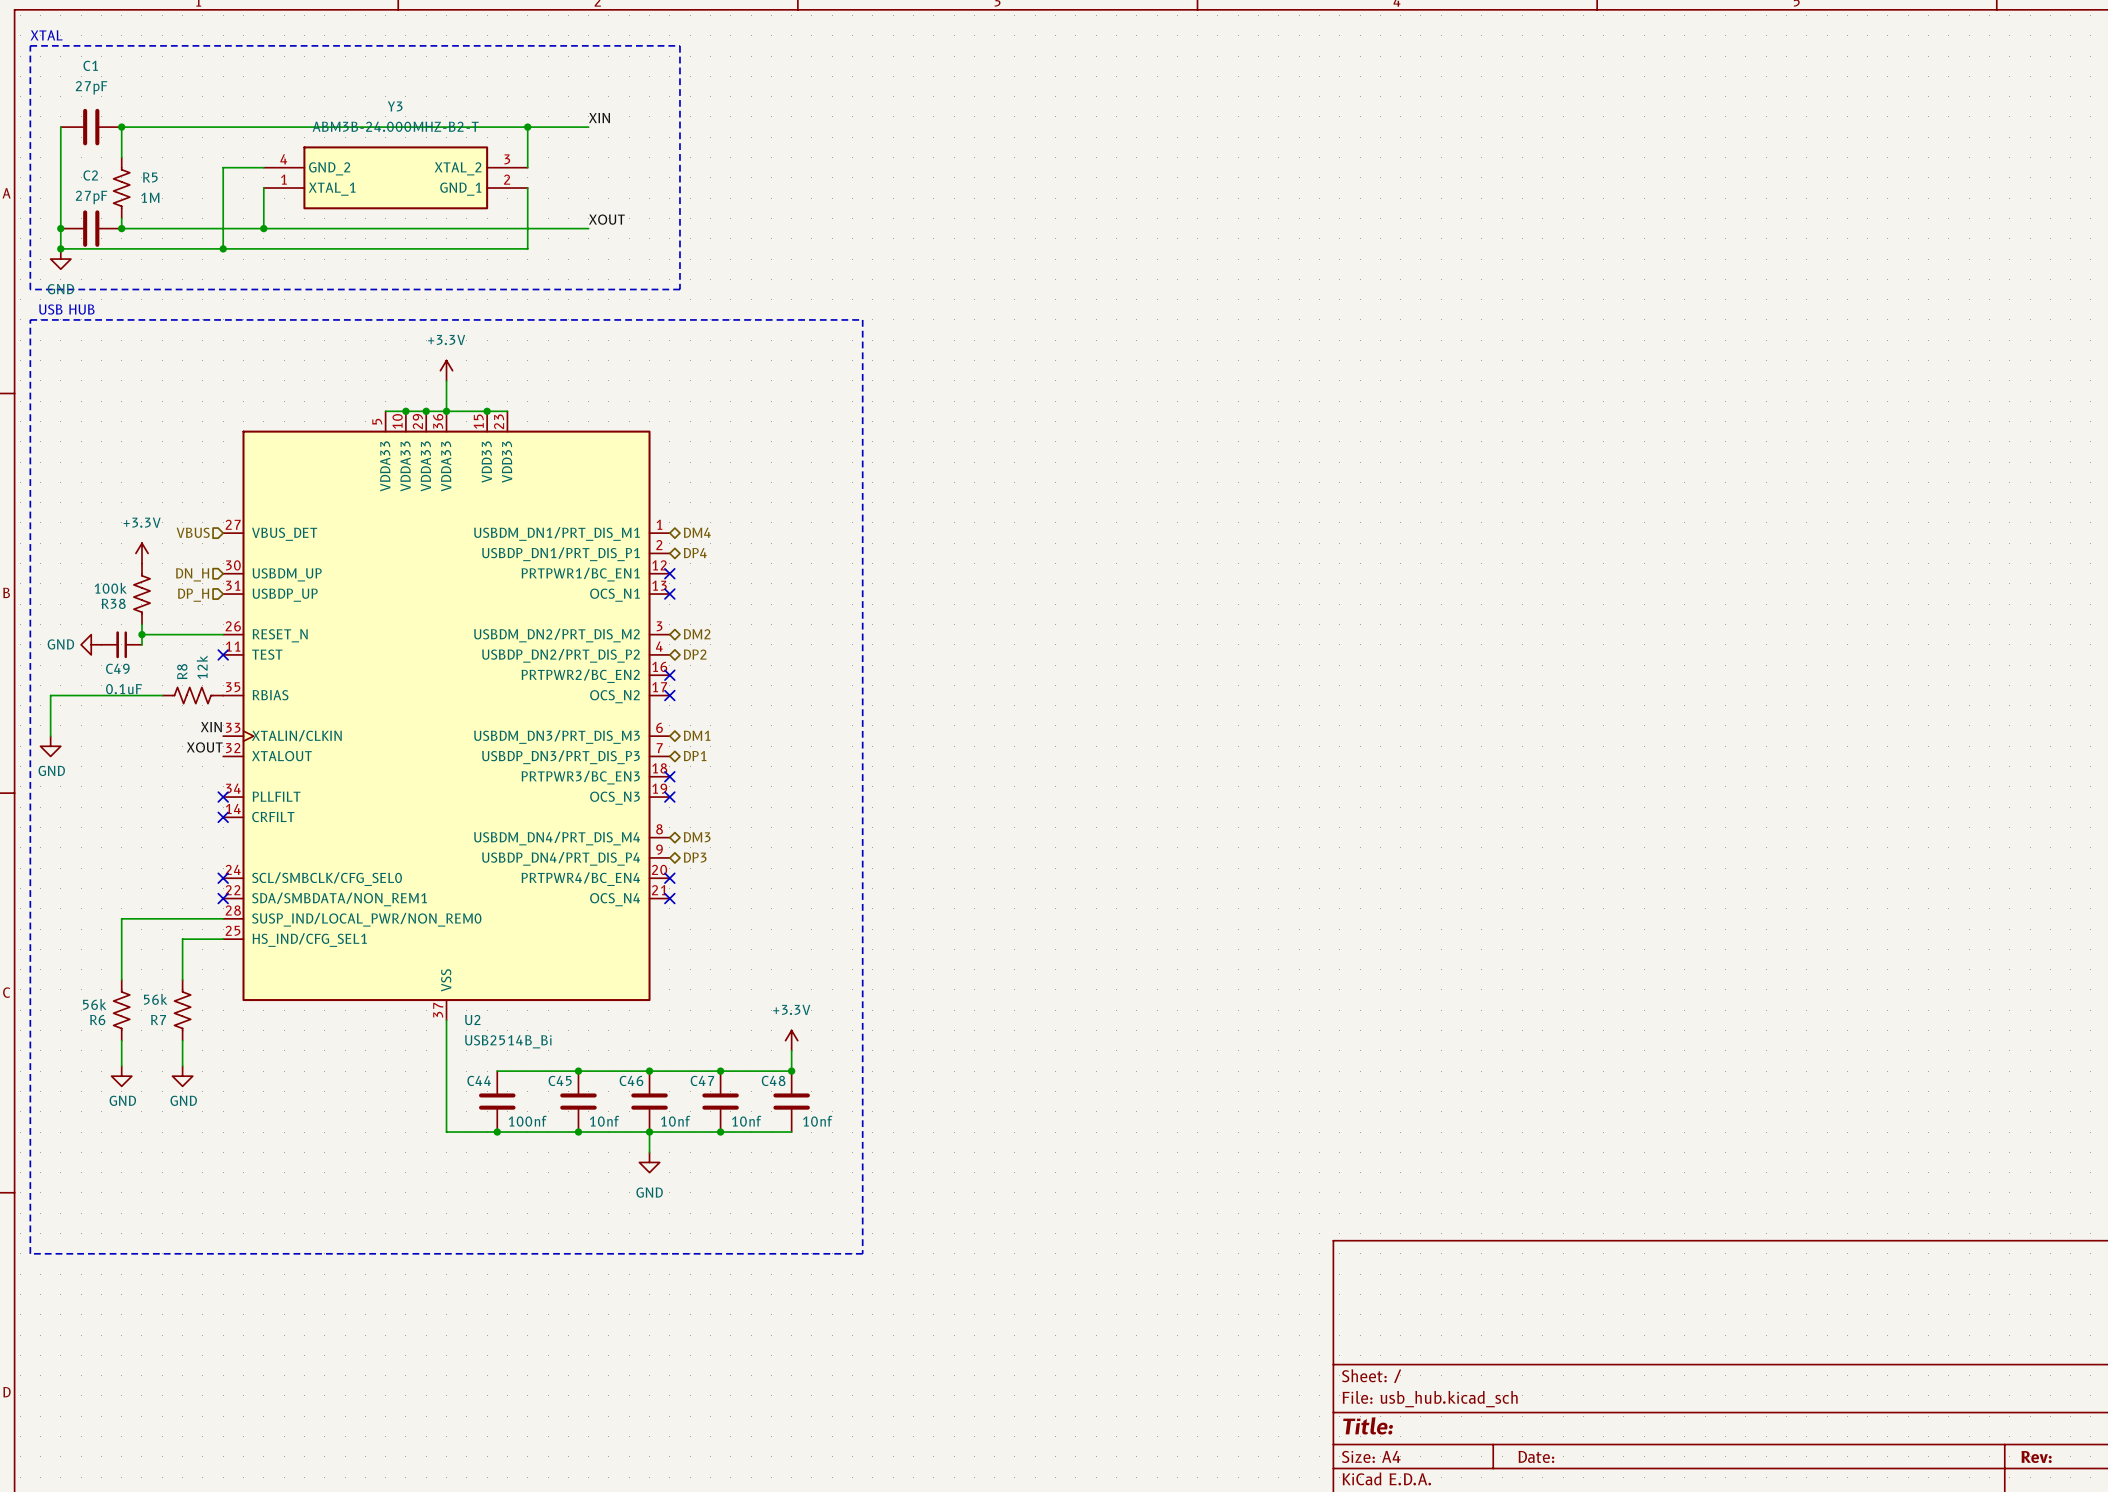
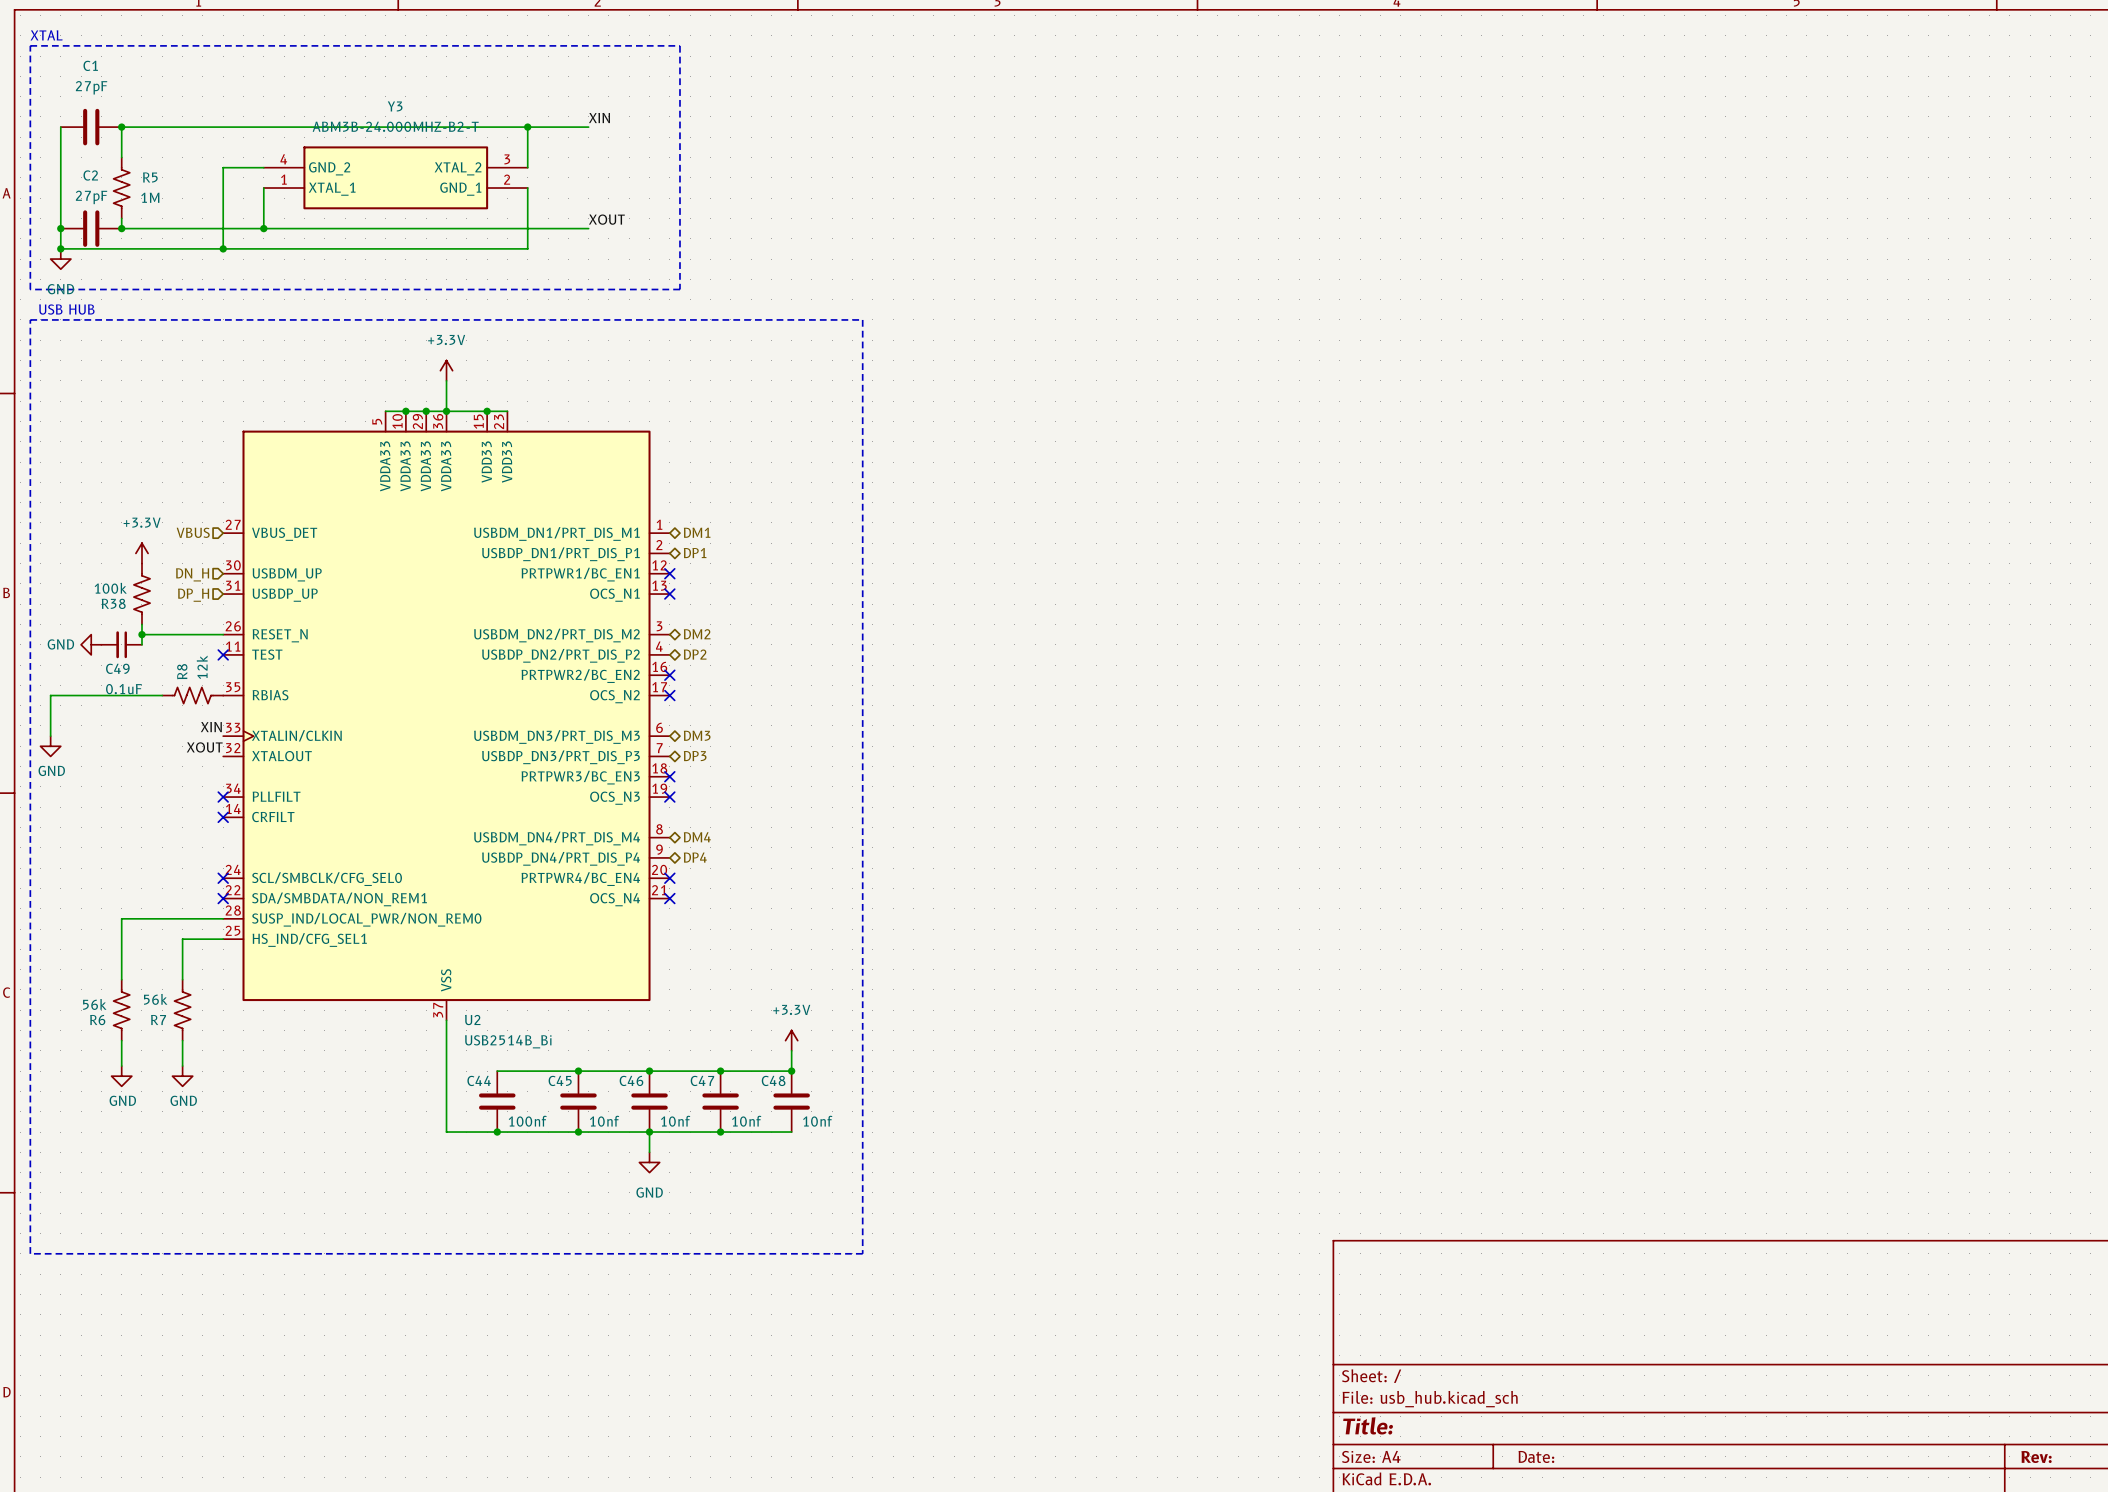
hierarchical label: DM4 (697, 532) -> DM1 (697, 532)
hierarchical label: DP4 (695, 553) -> DP1 (695, 553)
hierarchical label: DM1 (697, 735) -> DM3 (697, 735)
hierarchical label: DP1 (695, 756) -> DP3 (695, 756)
hierarchical label: DM3 (697, 837) -> DM4 (697, 837)
hierarchical label: DP3 (695, 857) -> DP4 (695, 857)

